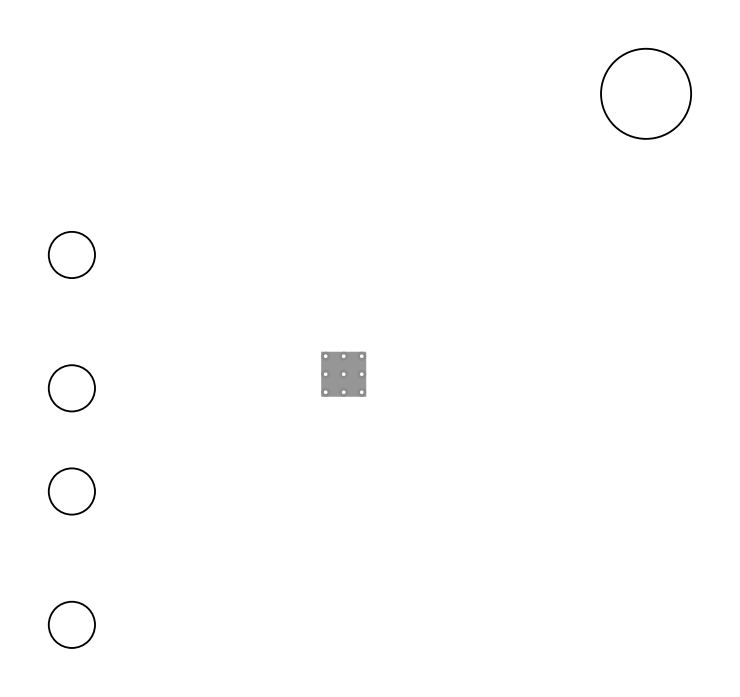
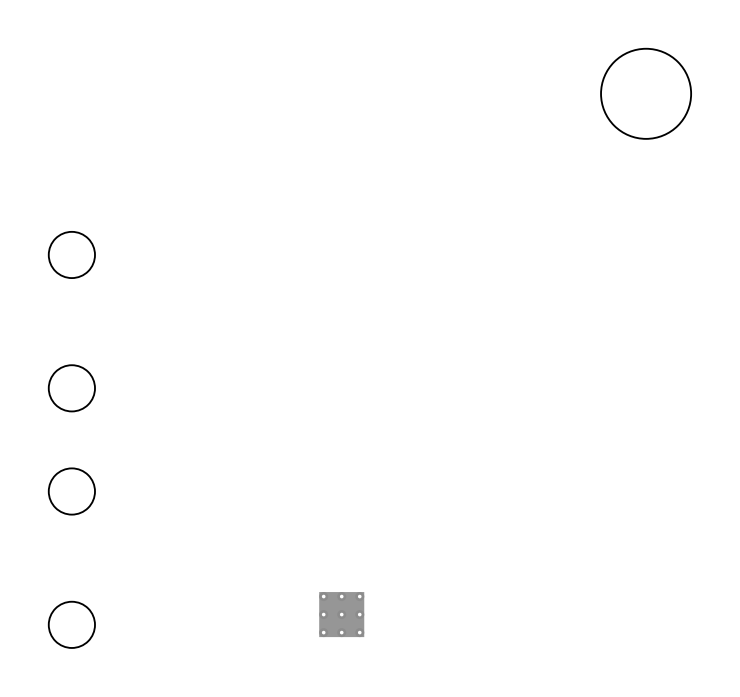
part position: (343, 374) -> (341, 614)

